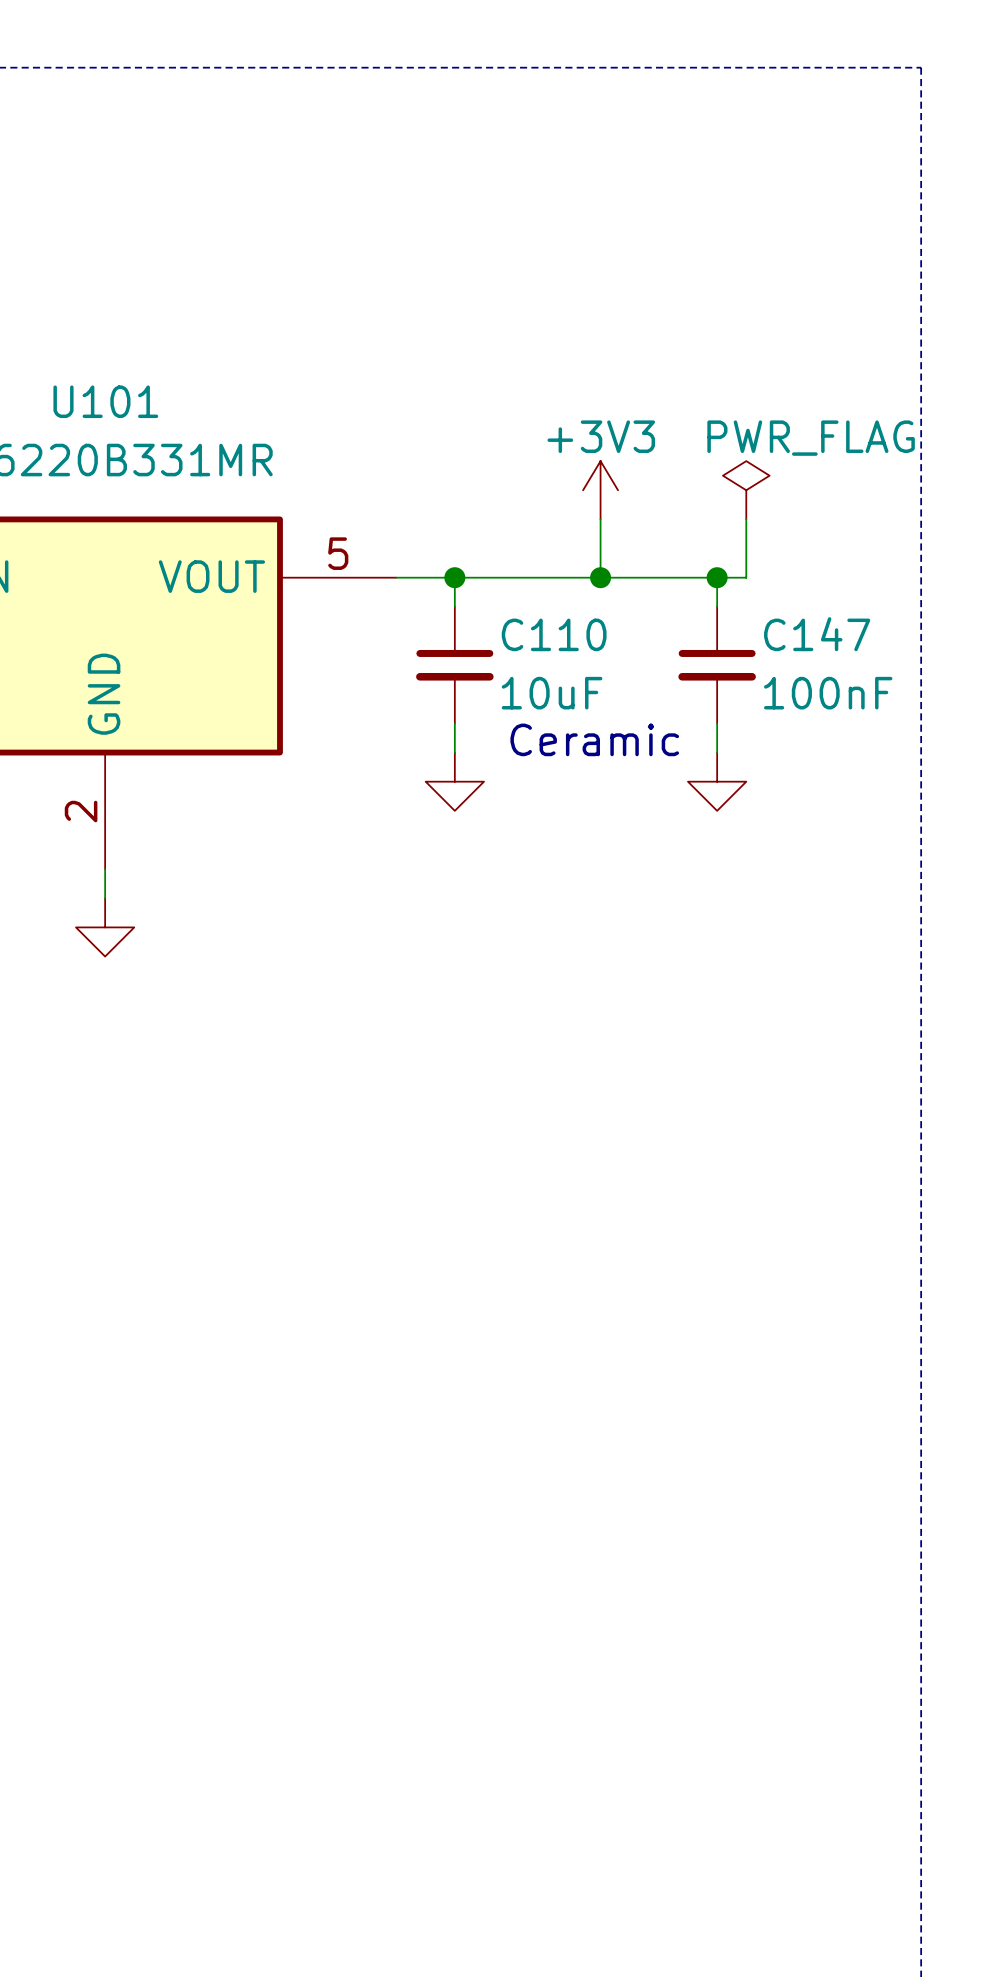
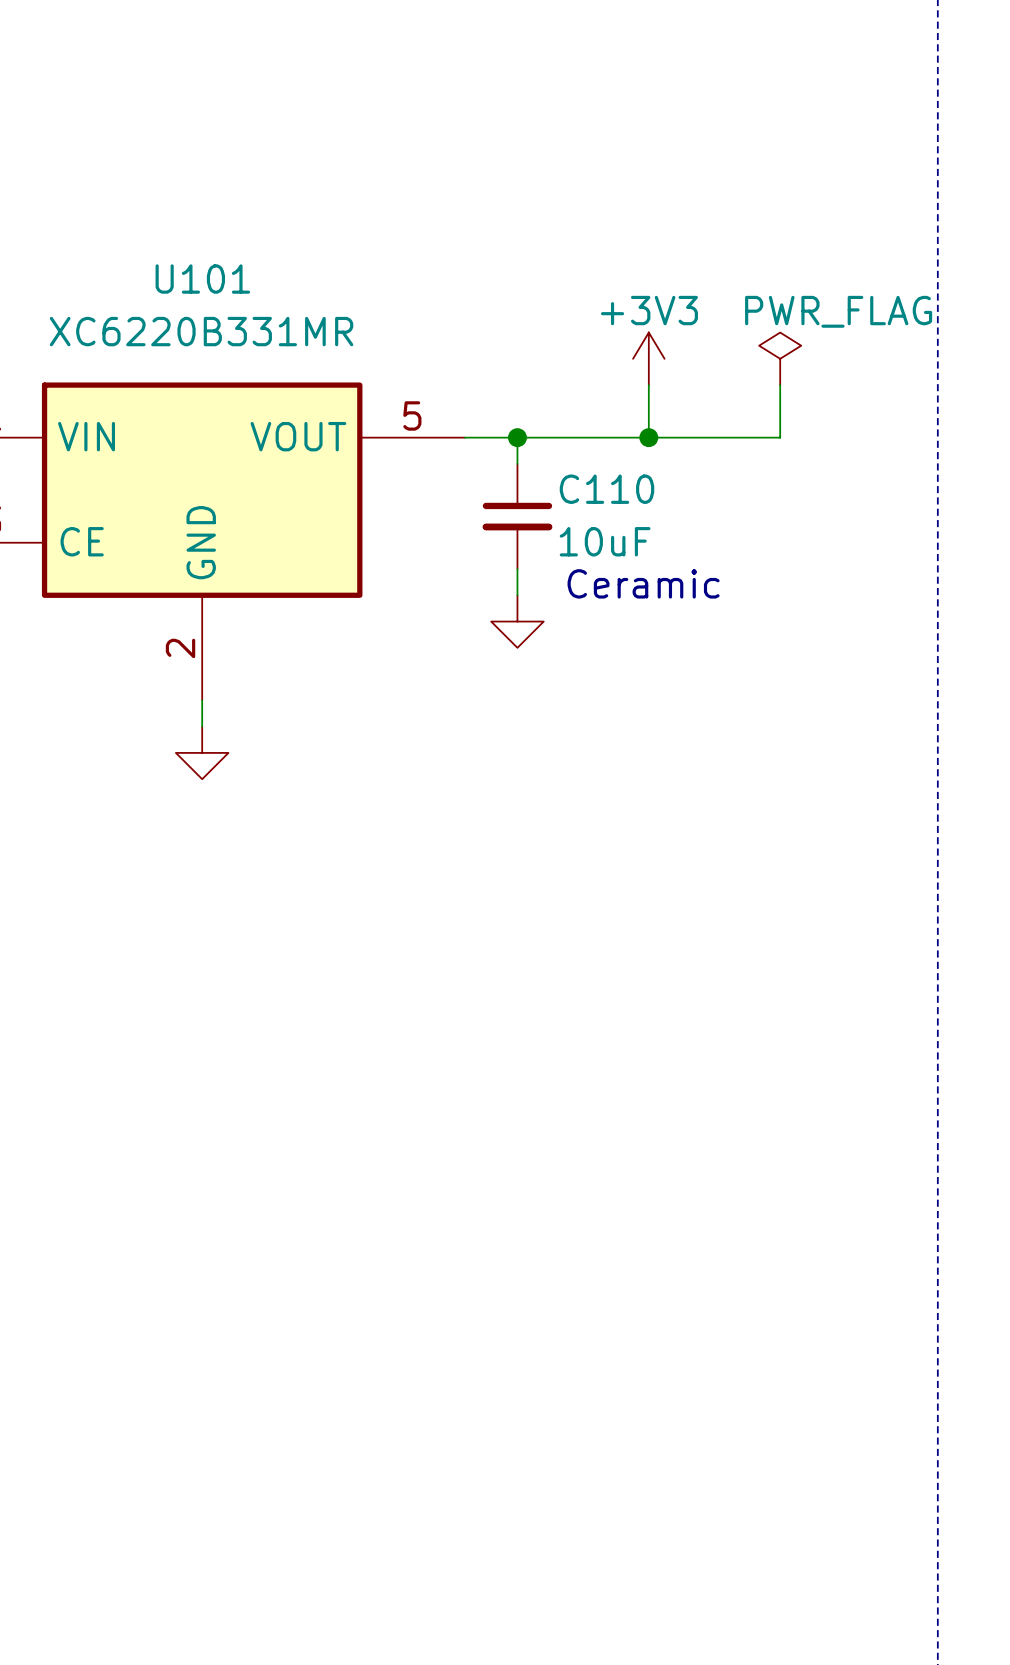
wire: (717, 577) (717, 606) -> none
junction: (717, 577) -> none
C147: 100nF (717, 665) -> none
wire: (717, 723) (717, 752) -> none
power symbol: (717, 781) -> none

